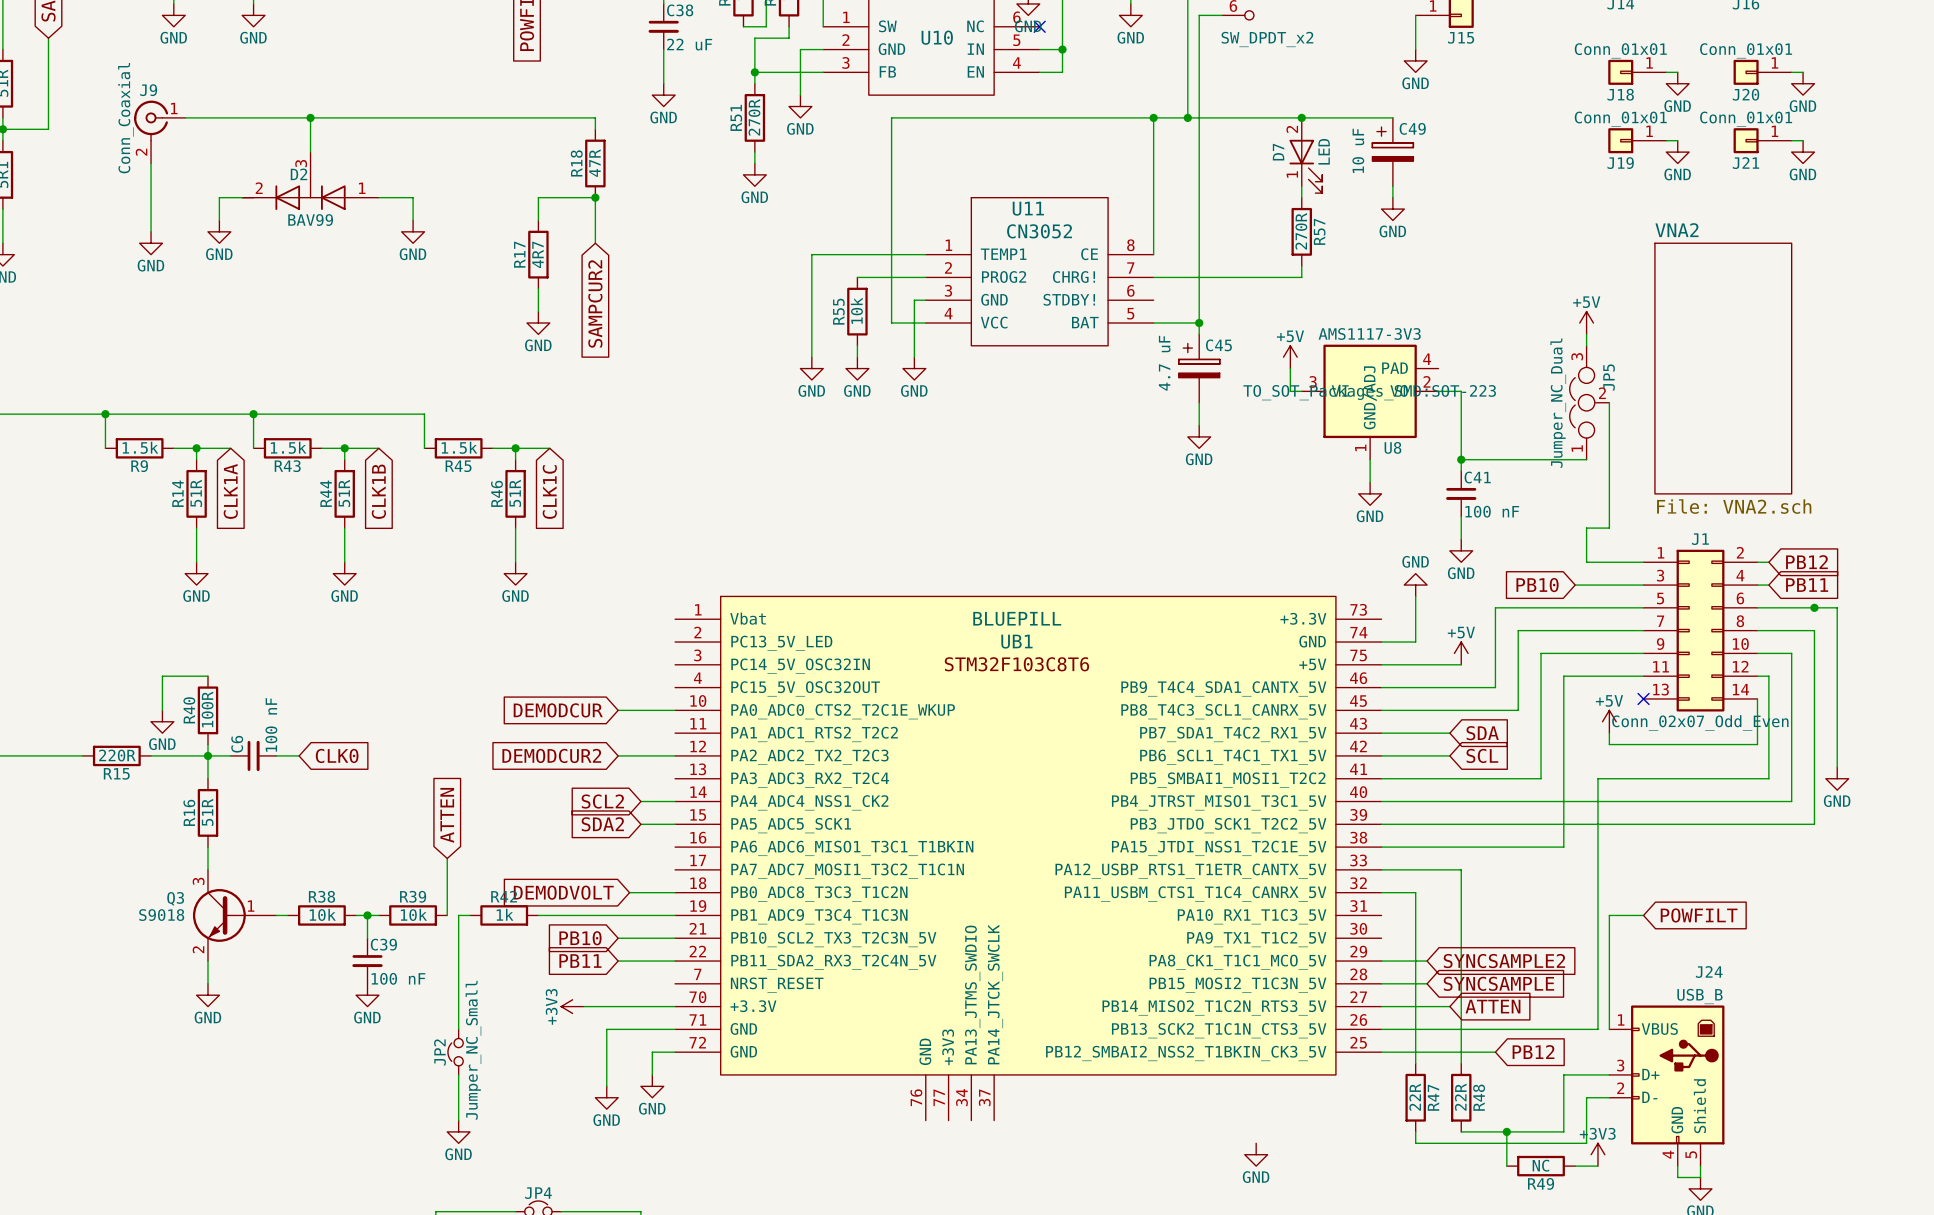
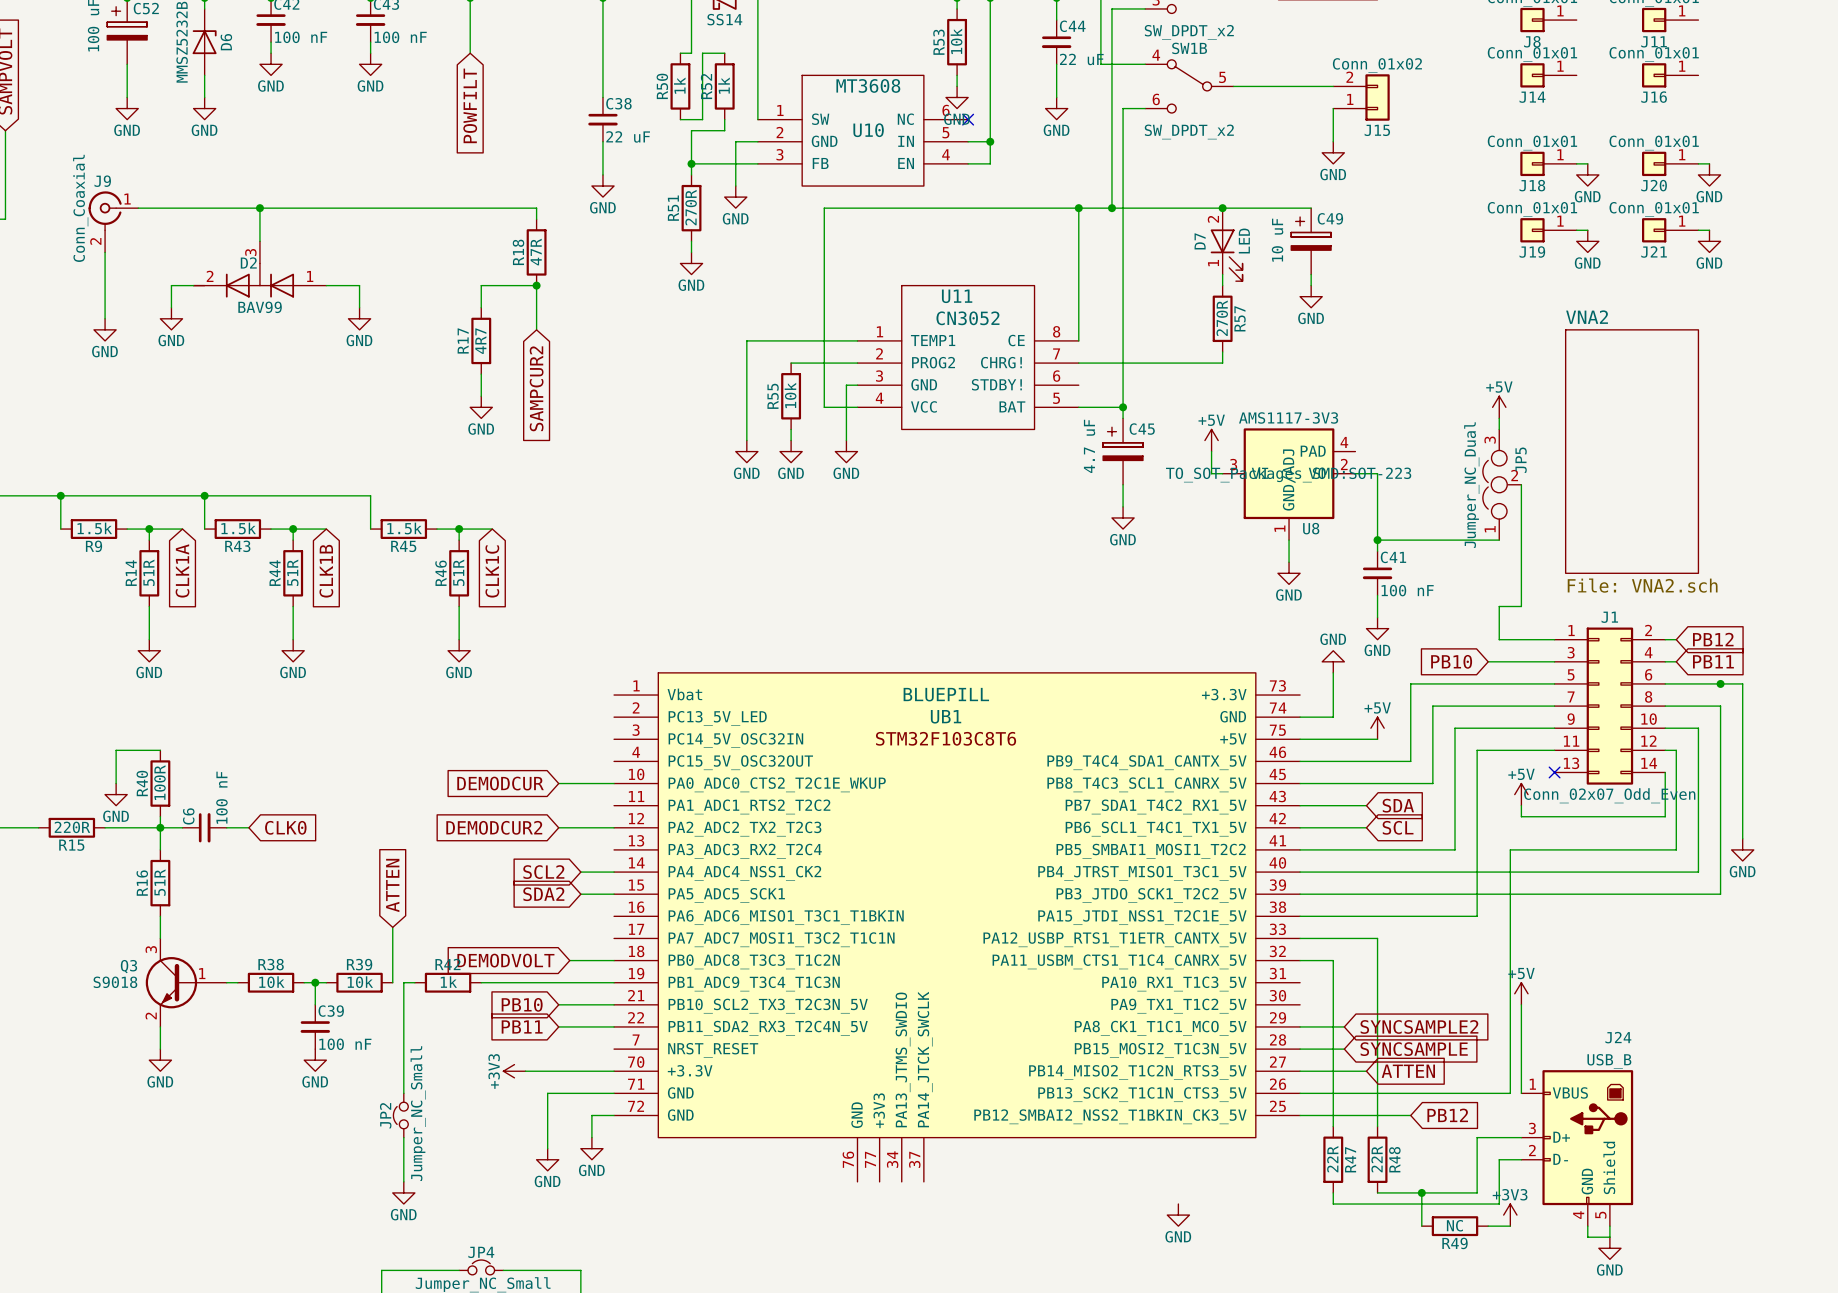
wire: (1643, 915) (1609, 915) (1609, 938) -> none
global label: POWFILT (1699, 915) -> none
power symbol: none -> +5V (1521, 993)

